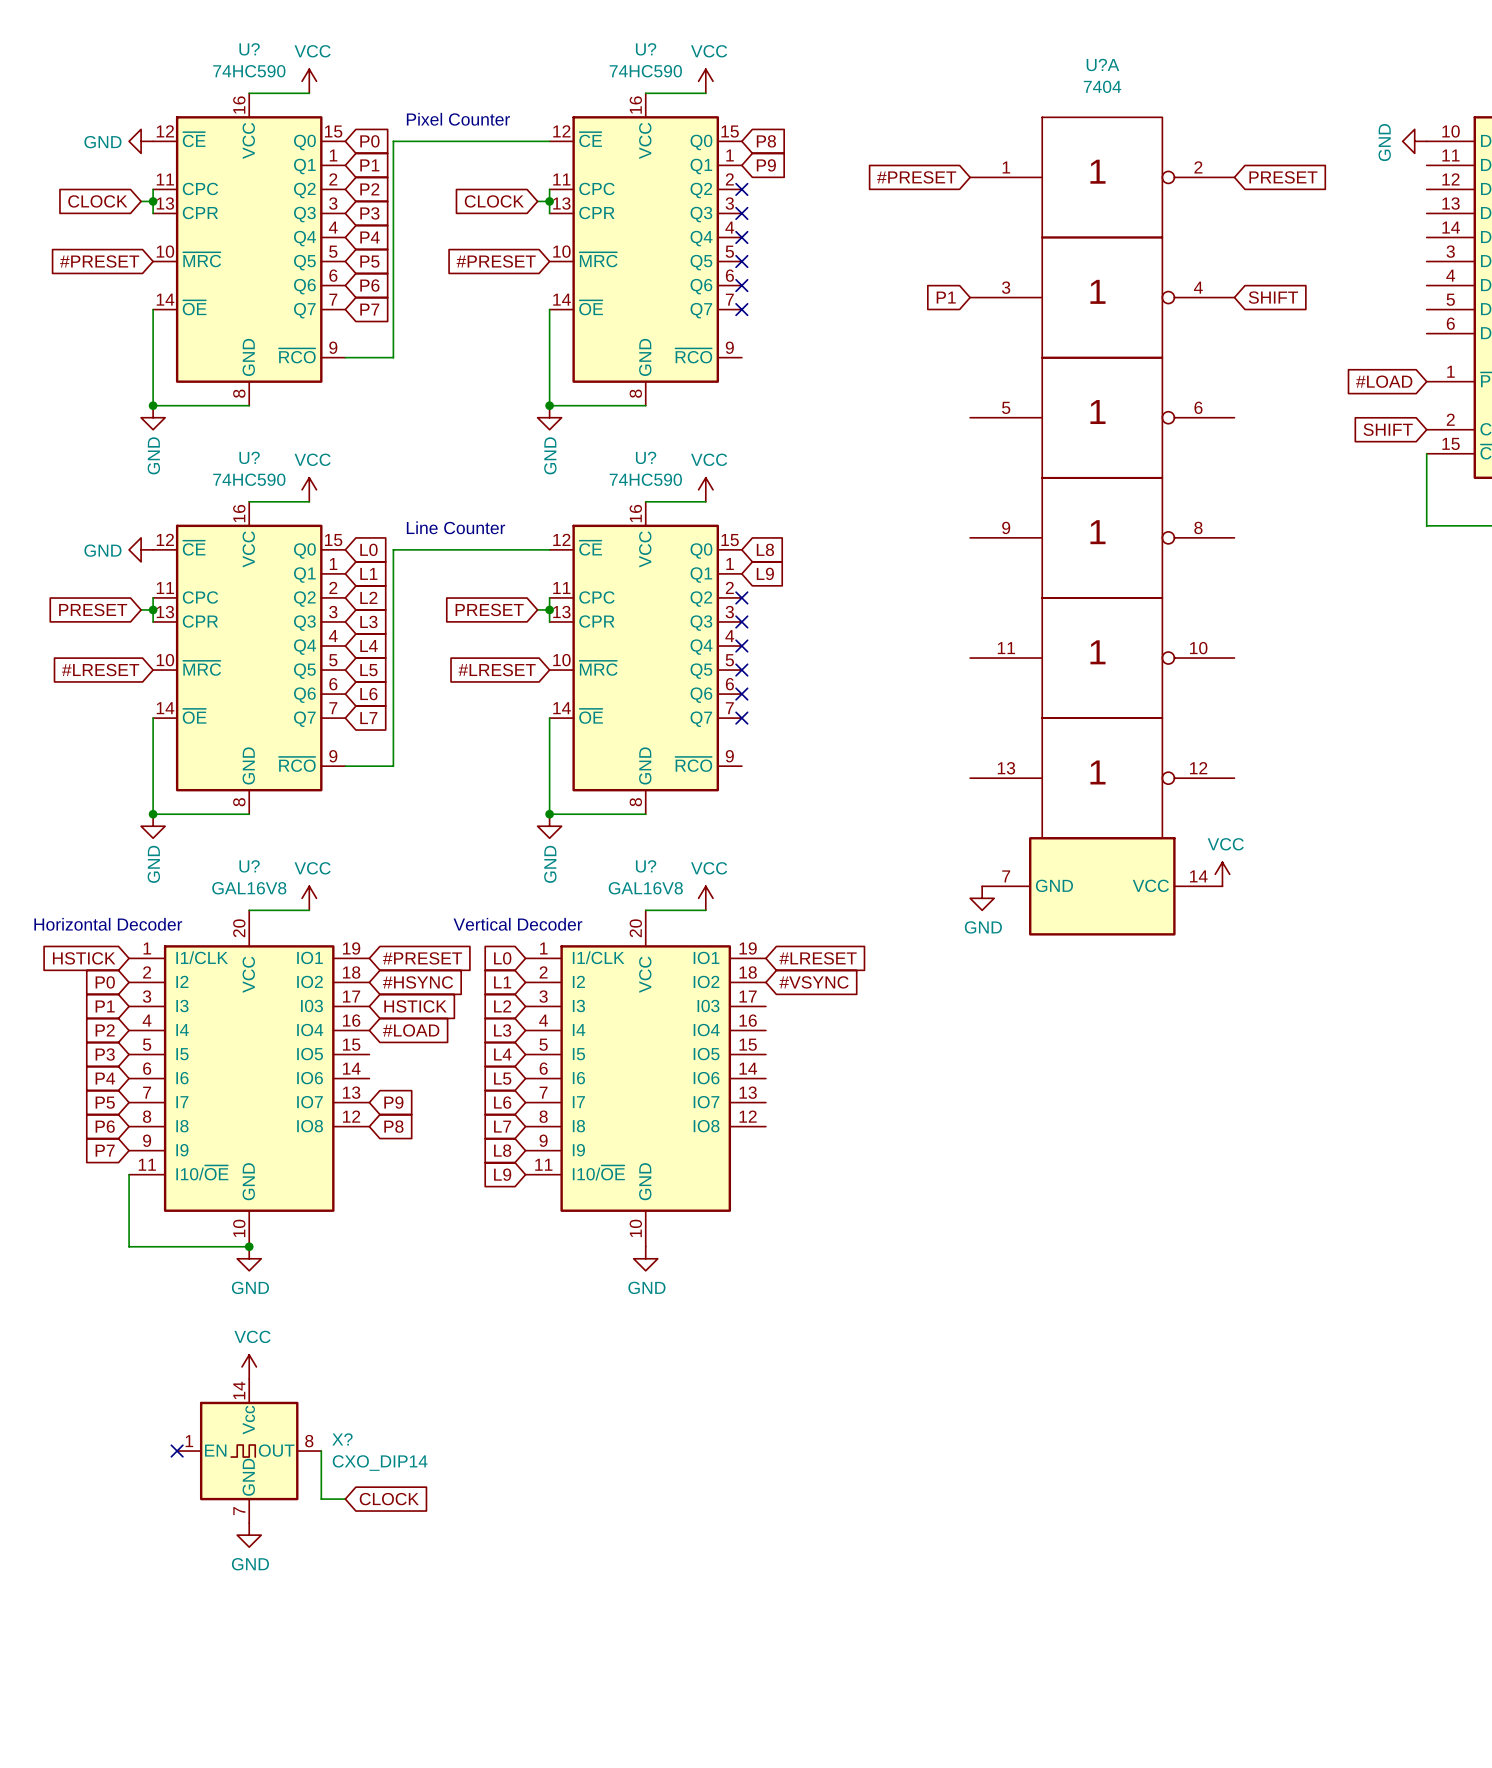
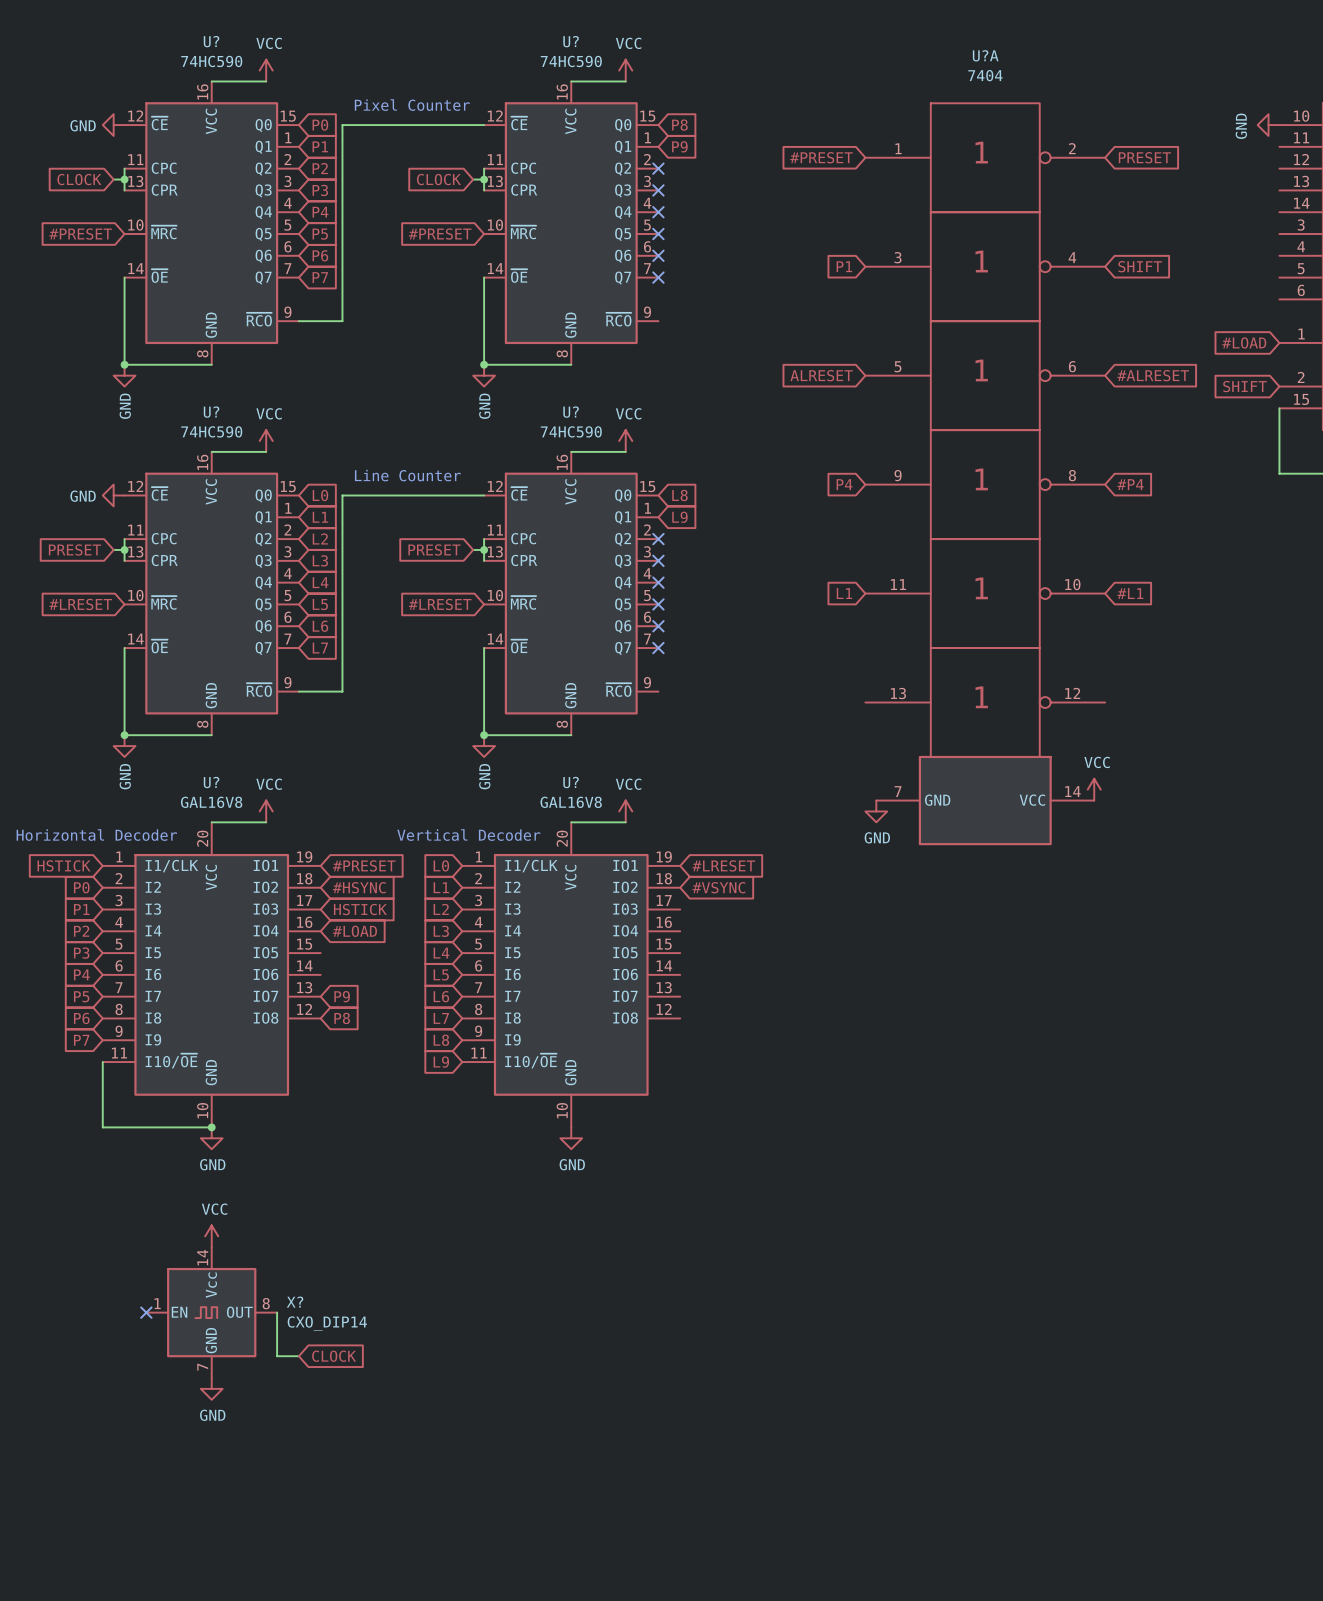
global label: none -> ALRESET (821, 375)
global label: none -> #ALRESET (1153, 375)
global label: none -> P4 (844, 484)
global label: none -> #P4 (1130, 484)
global label: none -> L1 (844, 593)
global label: none -> #L1 (1130, 593)

